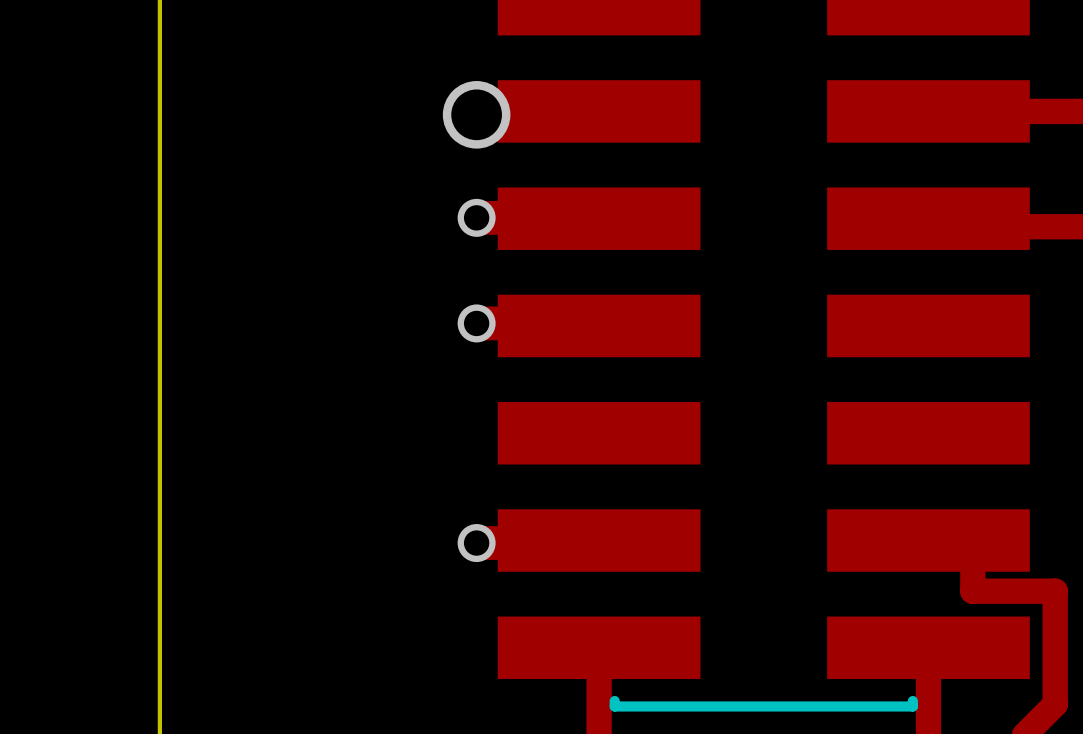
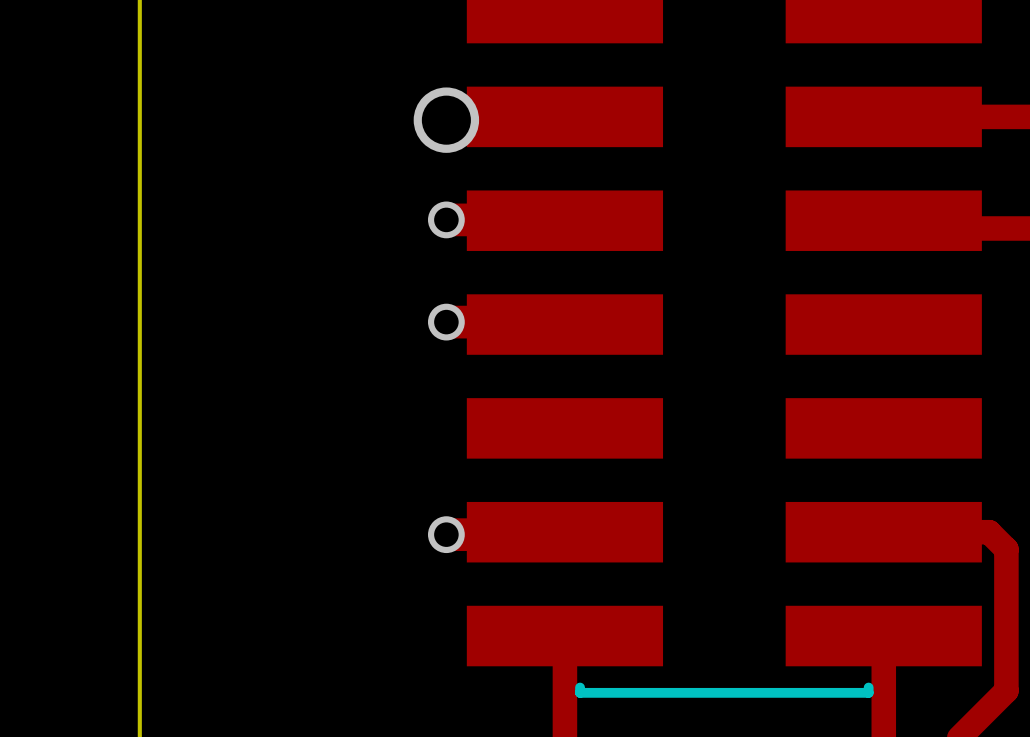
track: (998, 540) (972, 566) (972, 591) (1055, 591) -> (951, 532) (989, 532) (1006, 549) (1006, 581)

